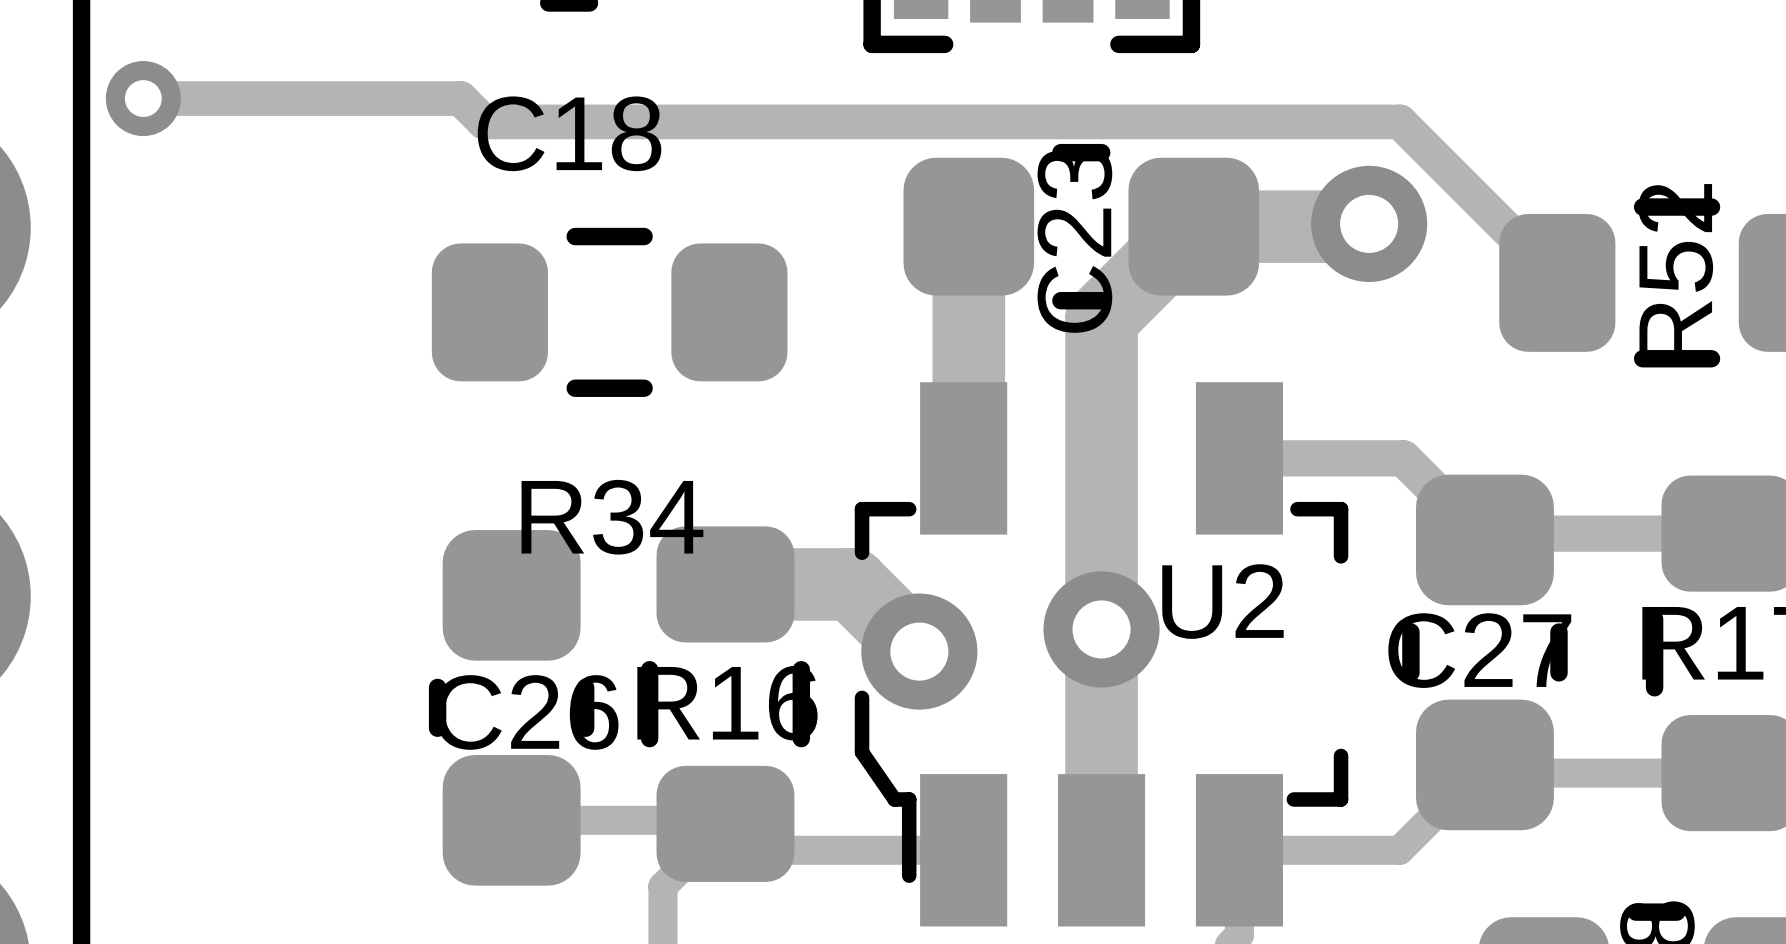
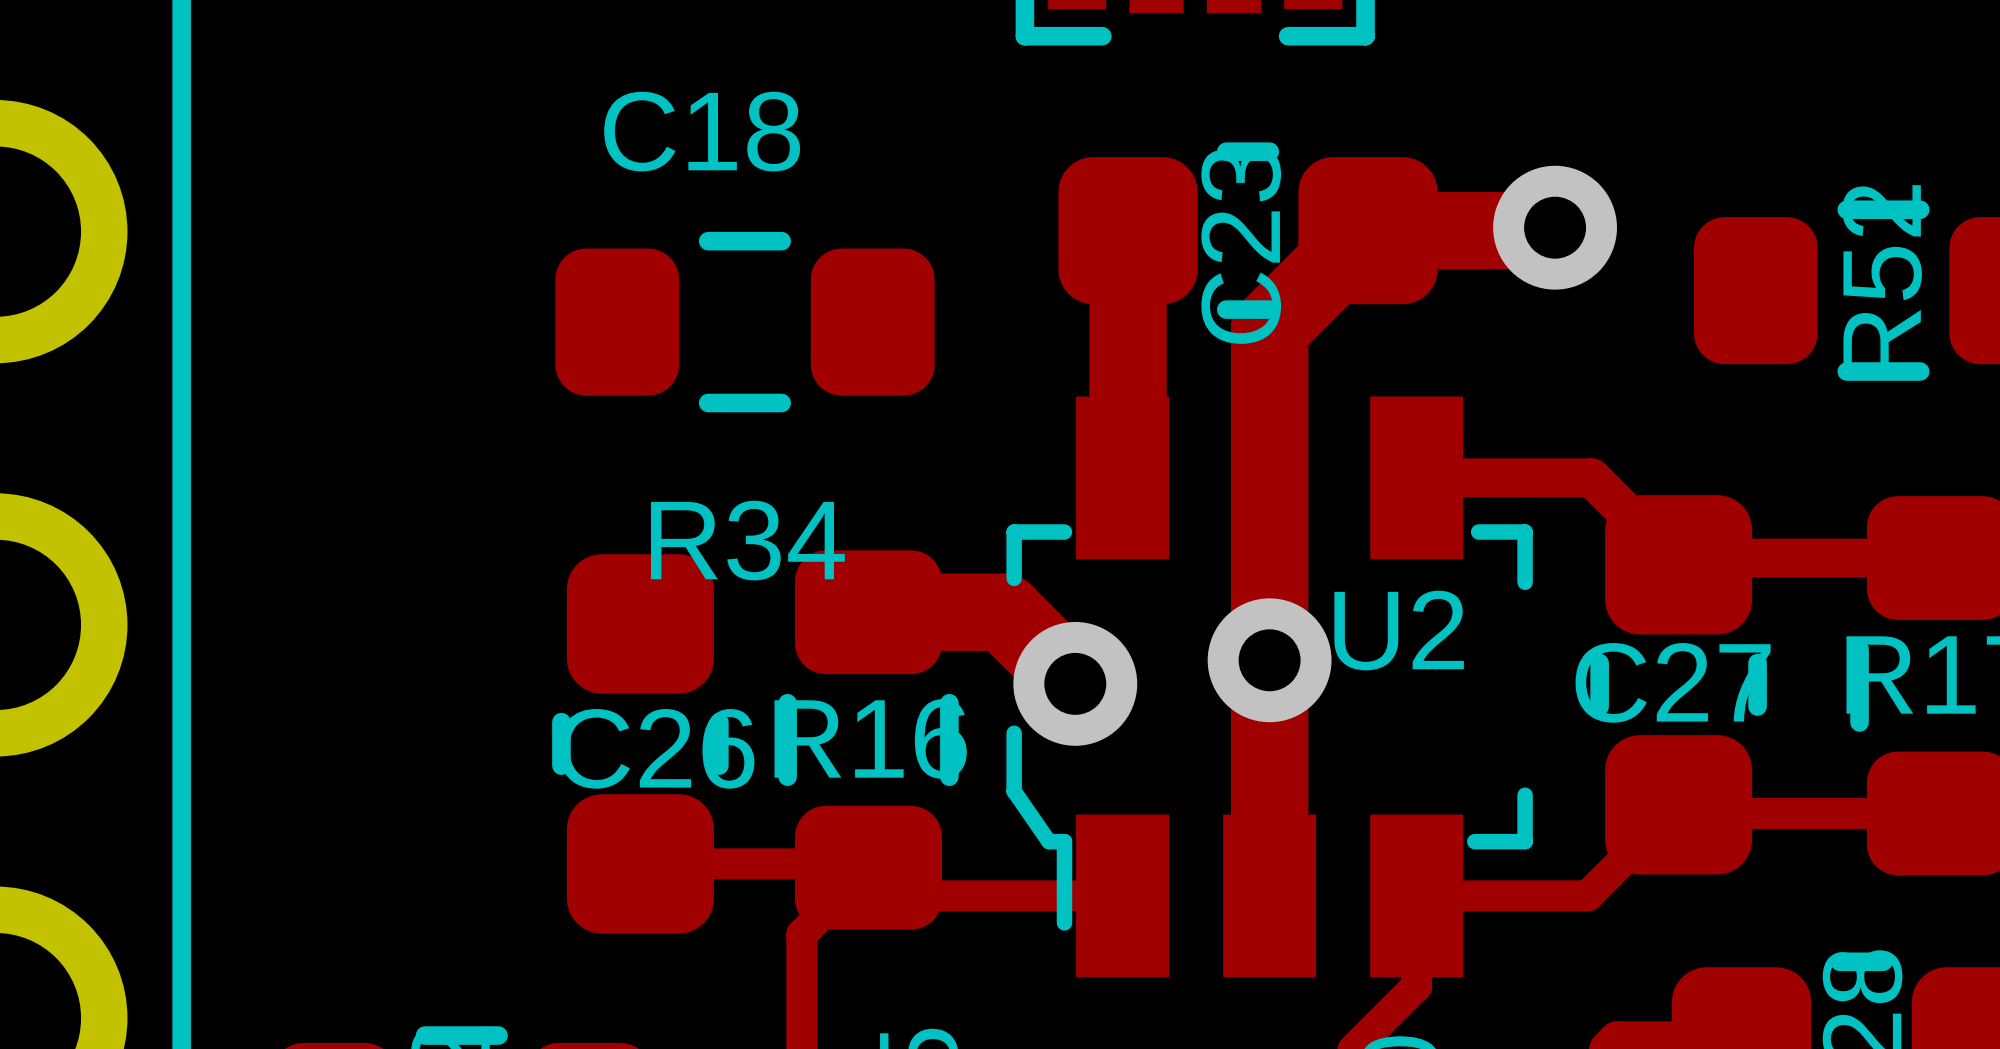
track: (143, 98) (460, 98) (483, 121) (1399, 121) (1557, 279) (1557, 282) -> none
via: (143, 98) -> none

